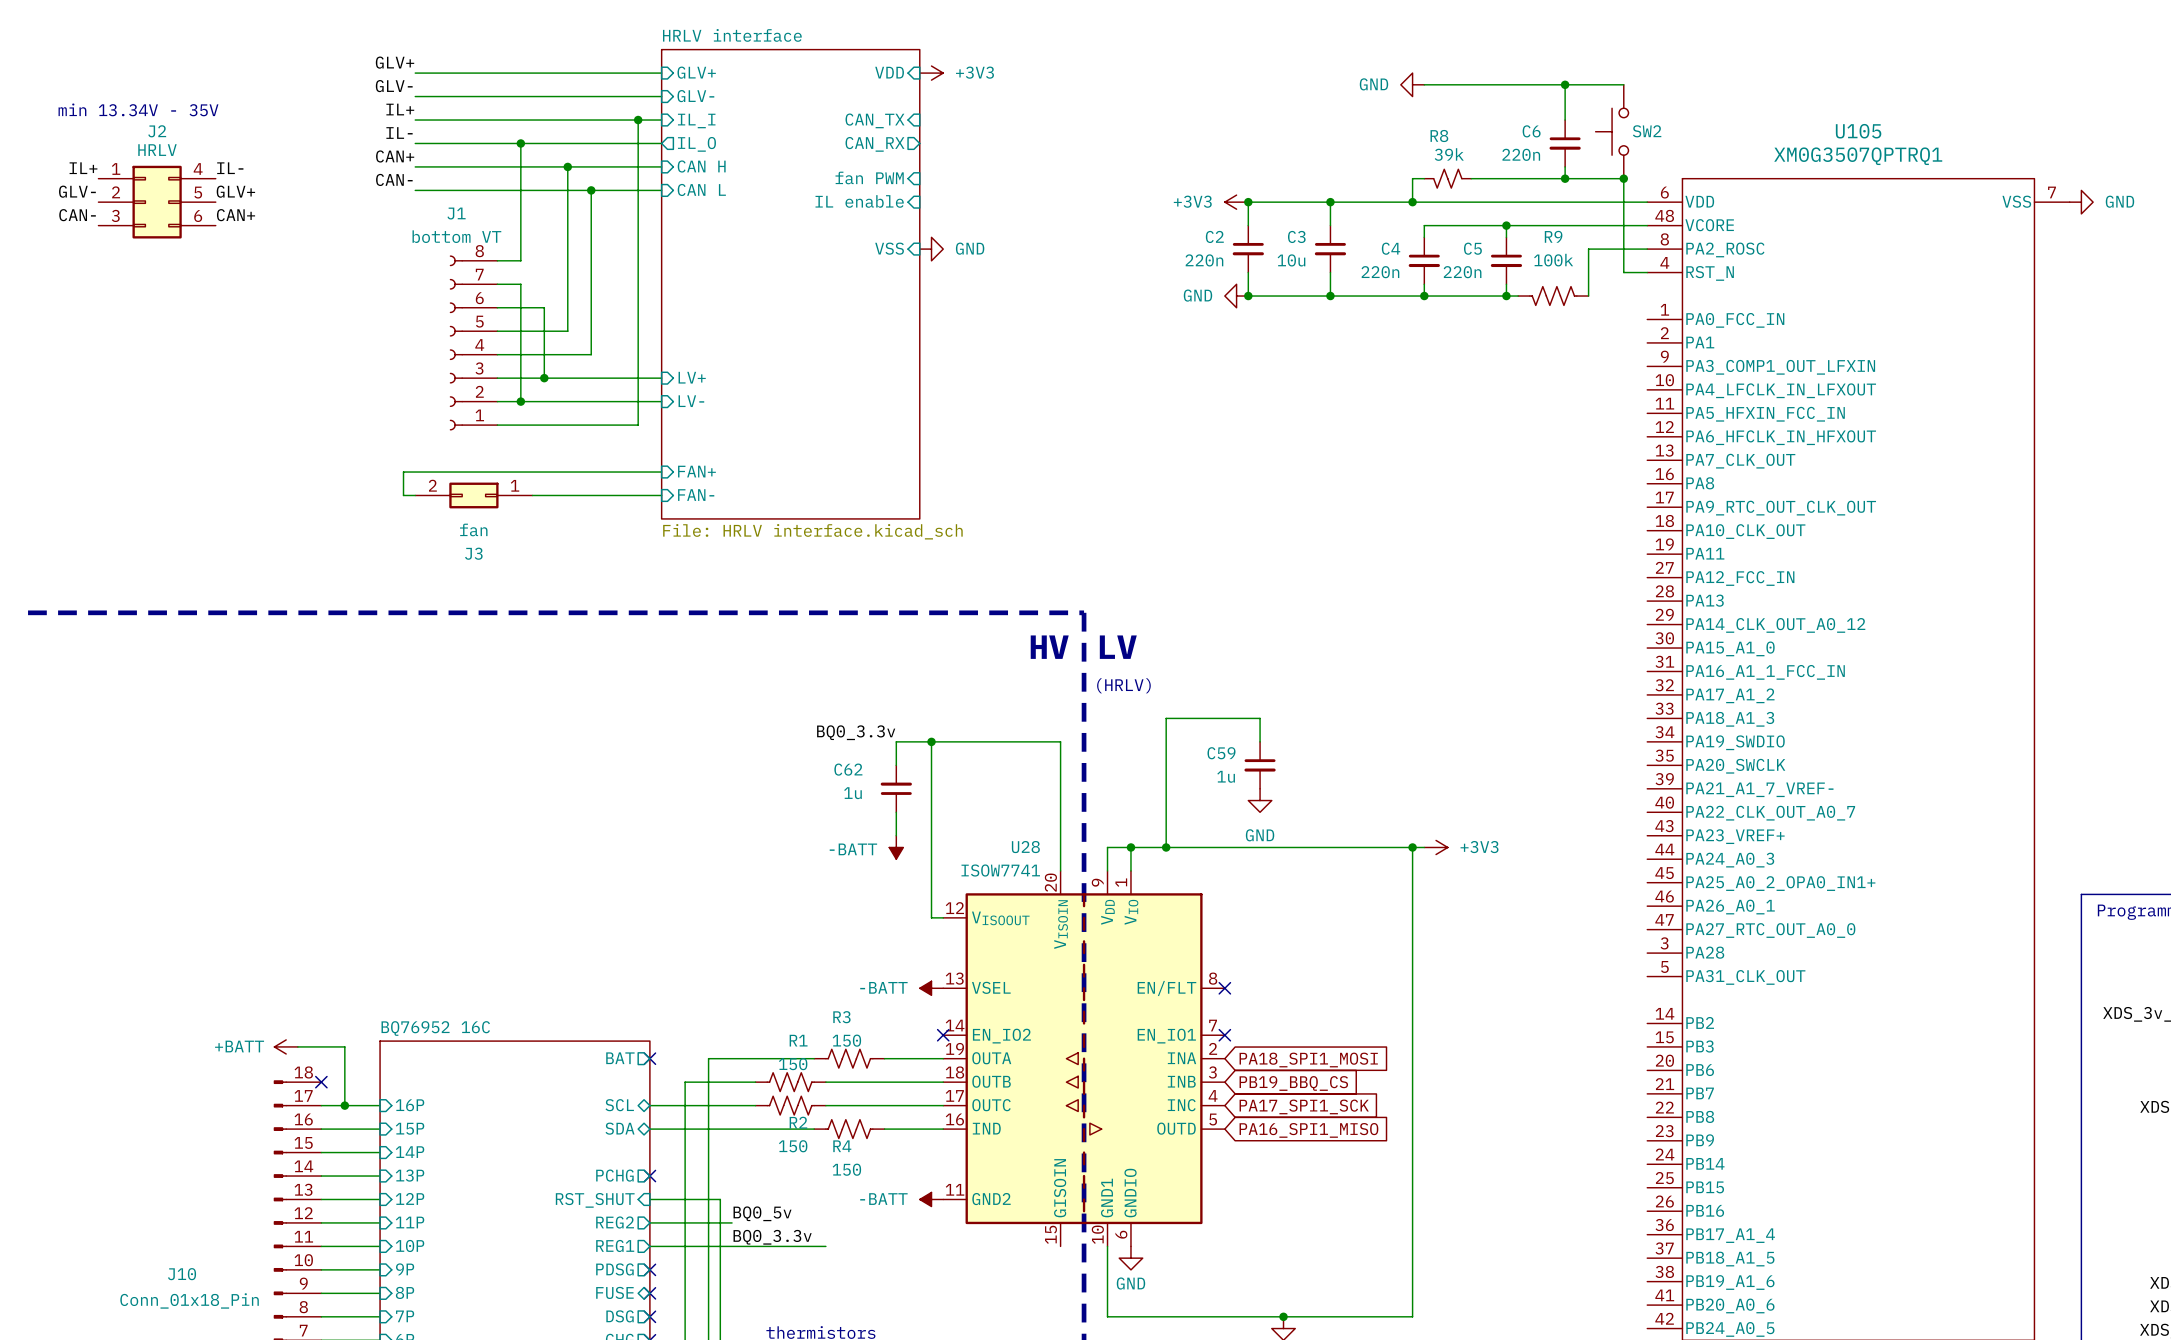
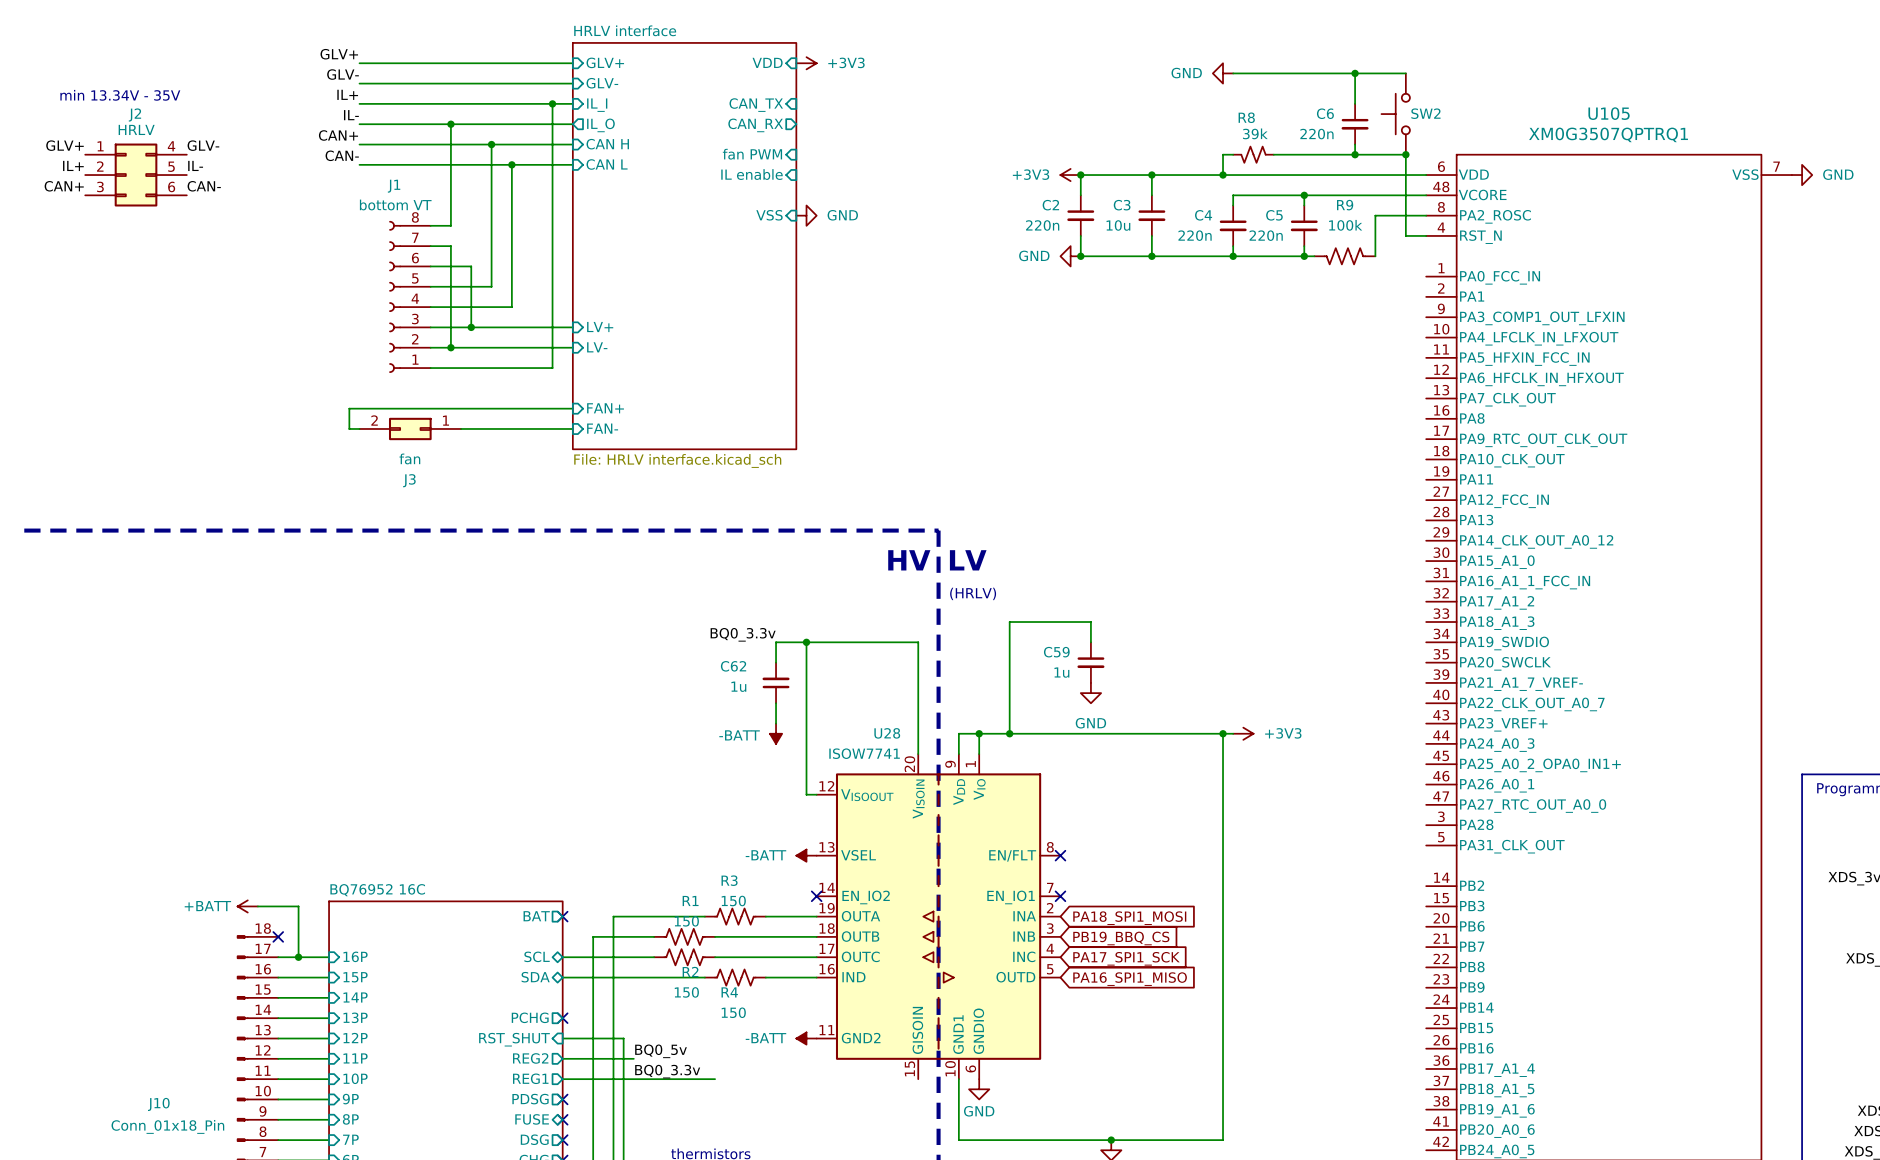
label: IL+ (83, 168) -> GLV+ (65, 145)
label: IL- (230, 168) -> GLV- (203, 145)
label: GLV- (77, 191) -> IL+ (73, 165)
label: GLV+ (235, 191) -> IL- (195, 165)
label: CAN- (77, 215) -> CAN+ (64, 186)
label: CAN+ (236, 215) -> CAN- (204, 186)

